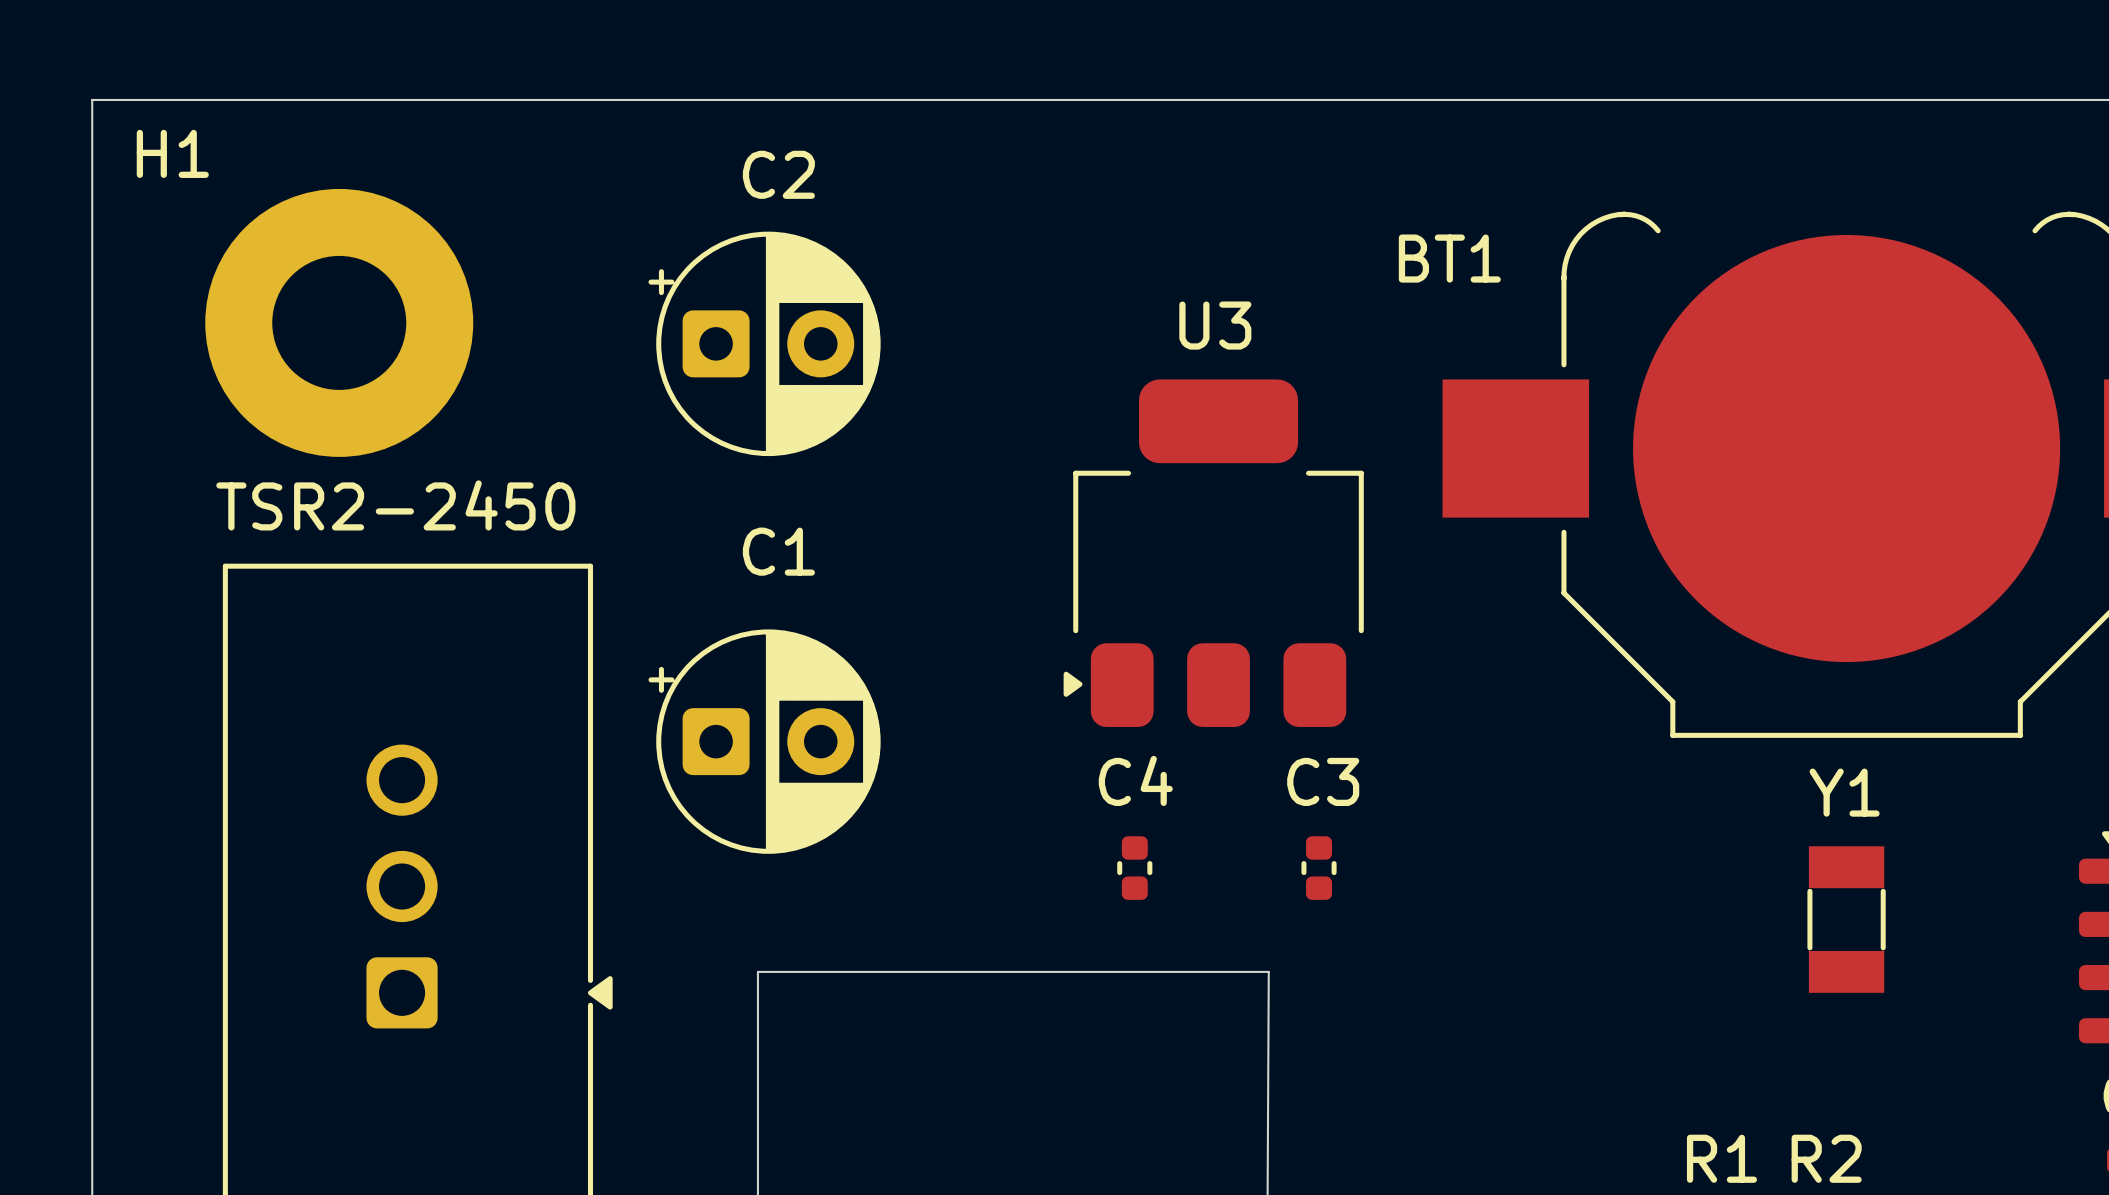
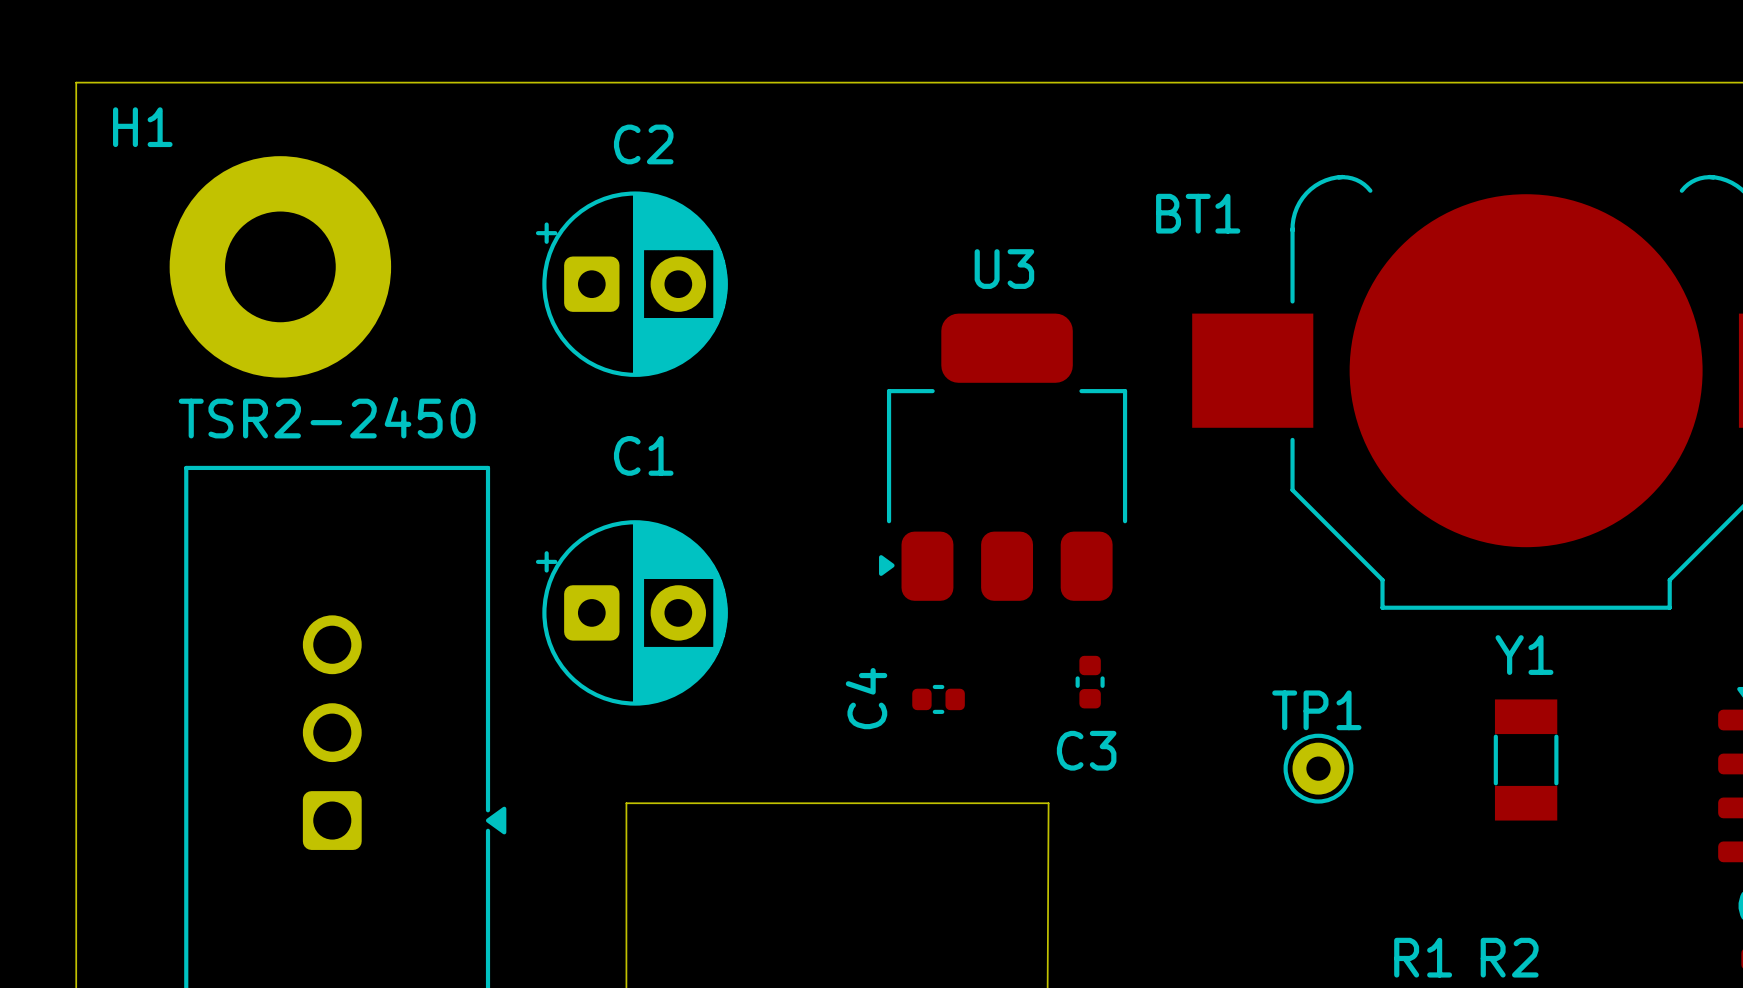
C4 name position: C4 (1135, 780) -> C4 (866, 698)
C3 name position: C3 (1323, 781) -> C3 (1086, 750)
C4 rotation: 0° (1134, 868) -> 90° clockwise (938, 699)
C3 position: (1319, 868) -> (1090, 682)
TP1: none -> (1318, 768)

